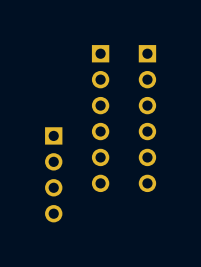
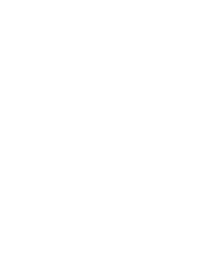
part: (100, 118) -> none
part: (147, 118) -> none
part: (53, 174) -> none

